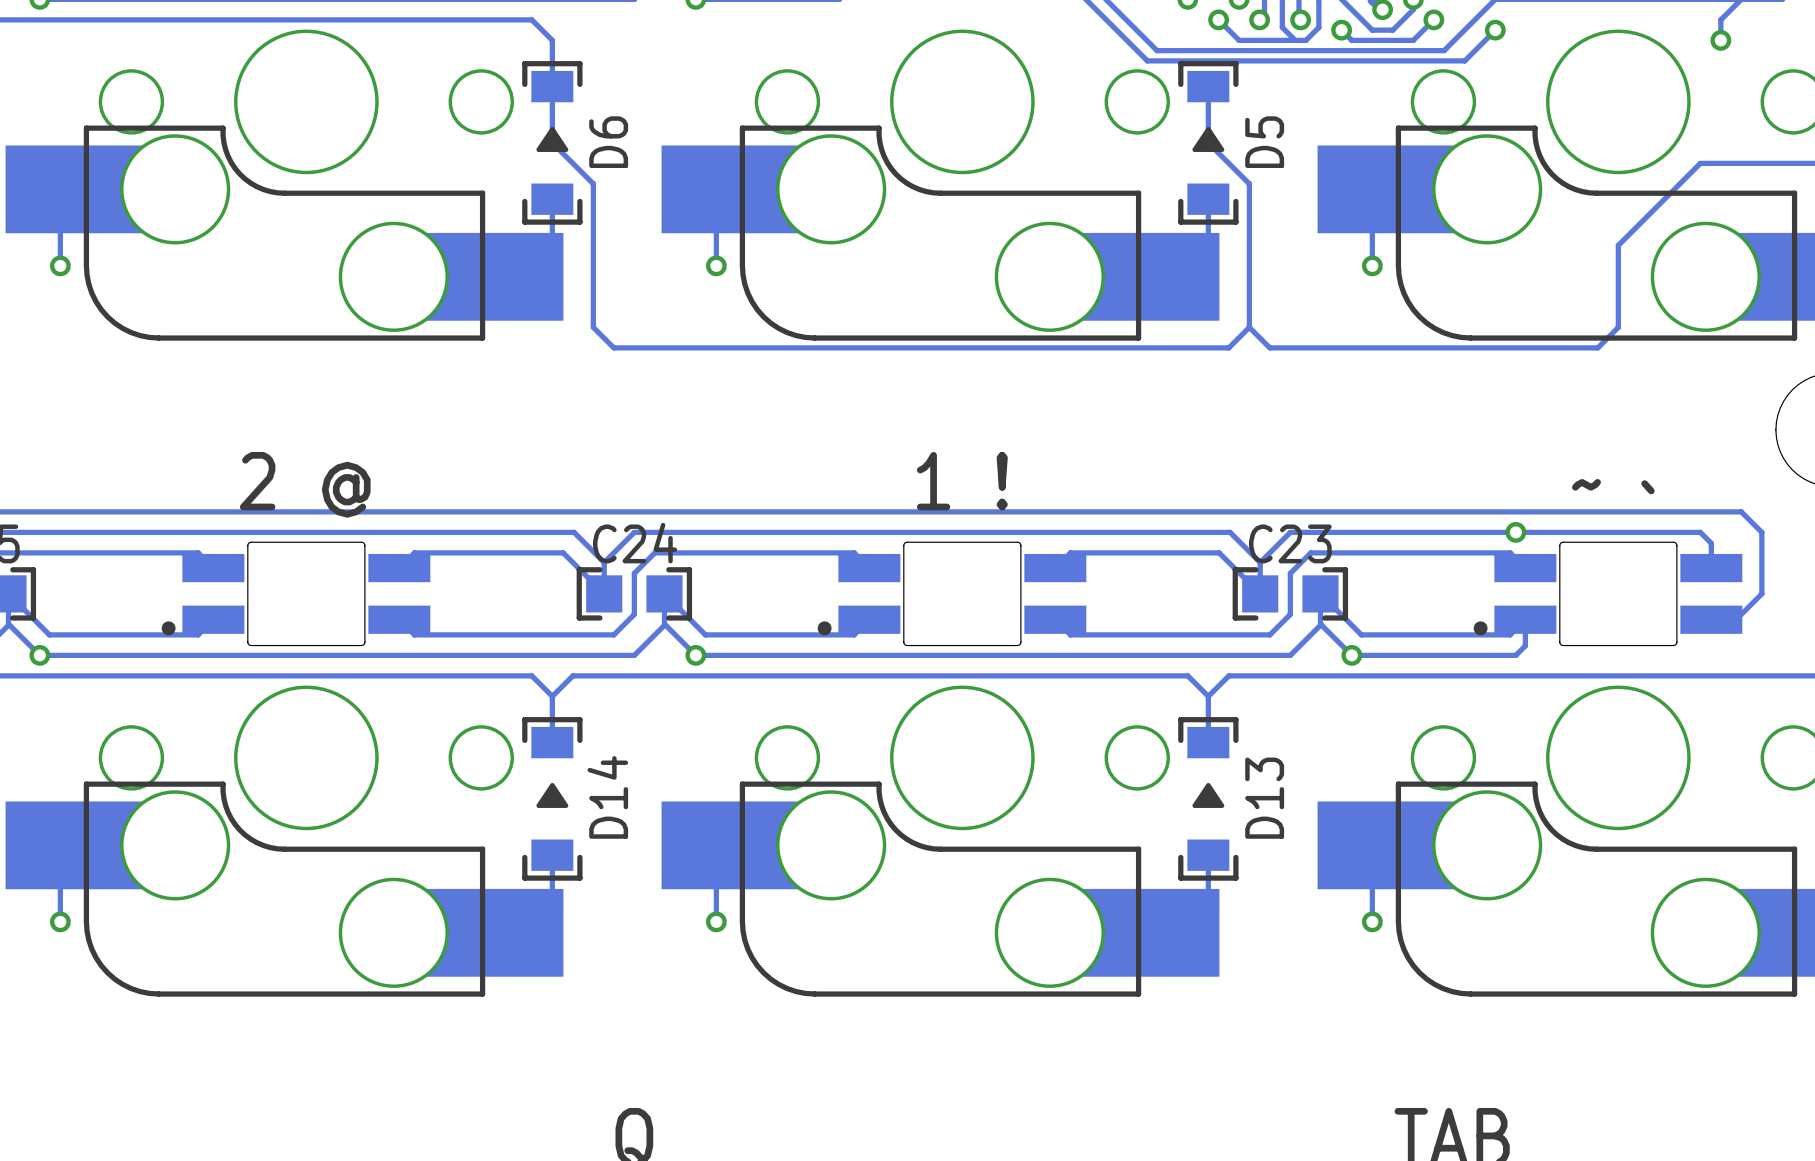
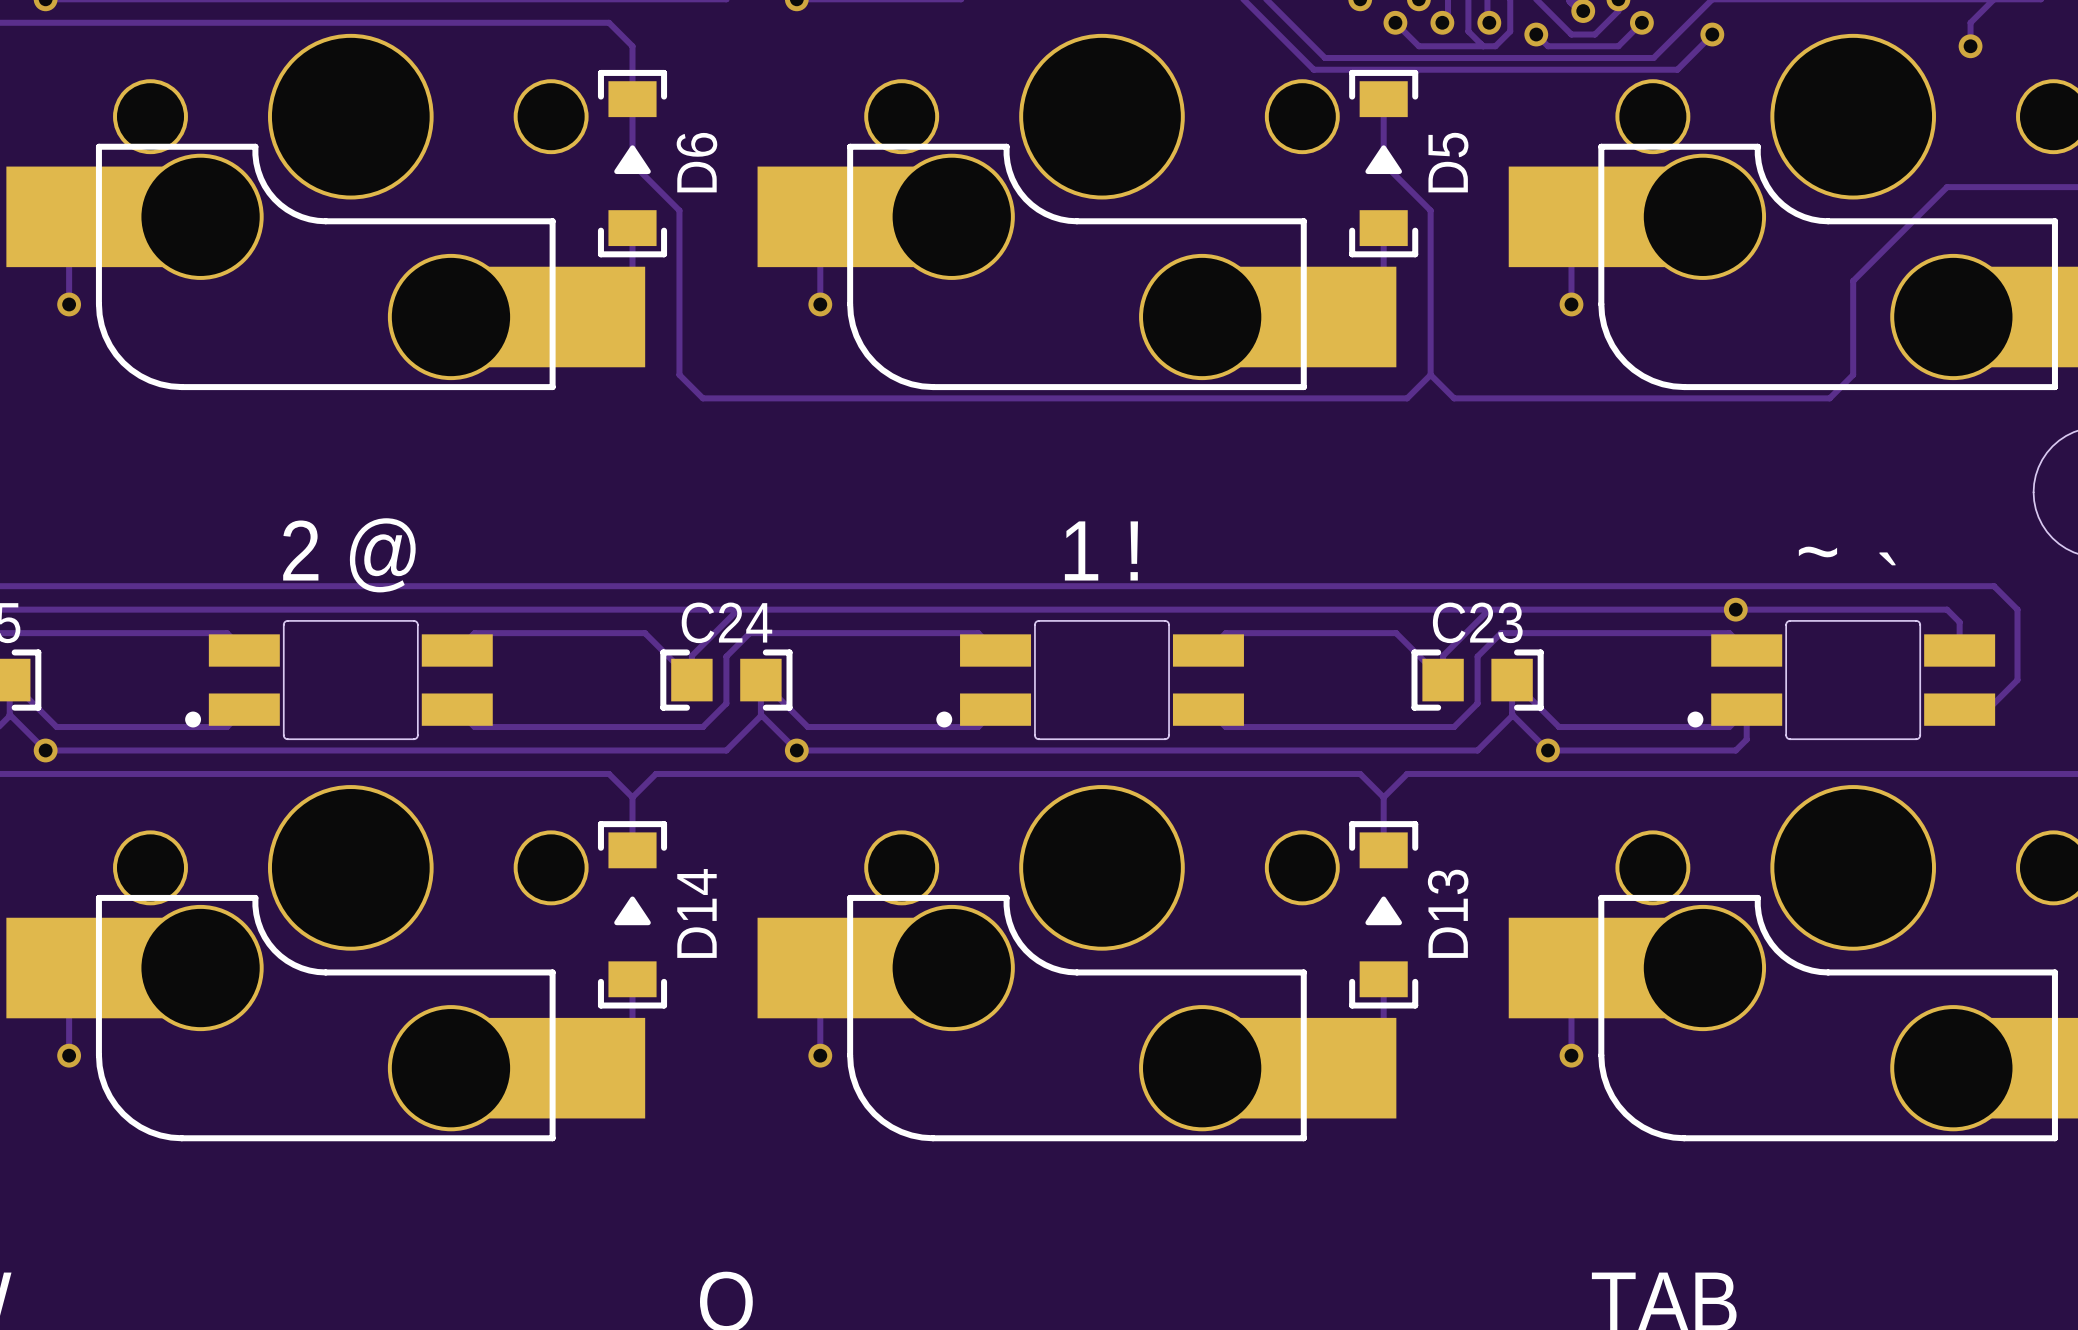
track: (574, 532) (604, 562) -> none
track: (634, 532) (604, 562) -> (726, 609) (657, 609)
track: (1230, 532) (1260, 562) -> none
track: (1290, 532) (1260, 562) -> (1477, 609) (1408, 609)
track: (604, 562) (604, 572) -> (738, 609) (691, 655)
track: (1260, 562) (1260, 572) -> (1489, 609) (1443, 655)

